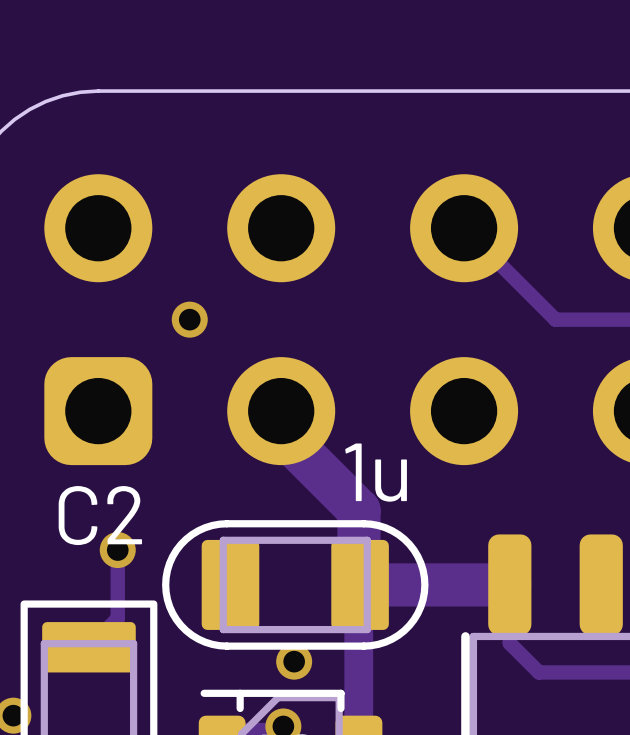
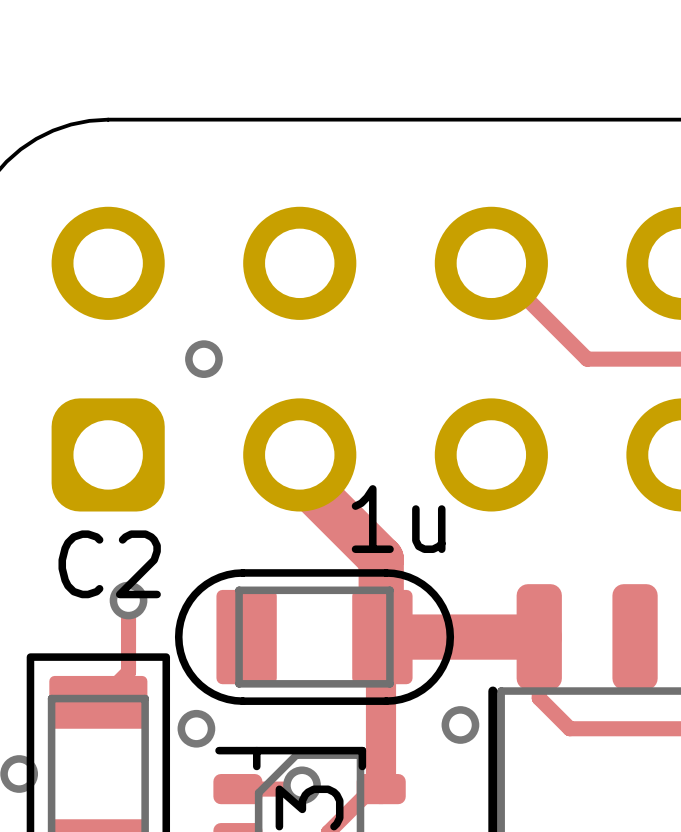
via: (294, 661) -> none
via: none -> (460, 724)
via: none -> (196, 728)

